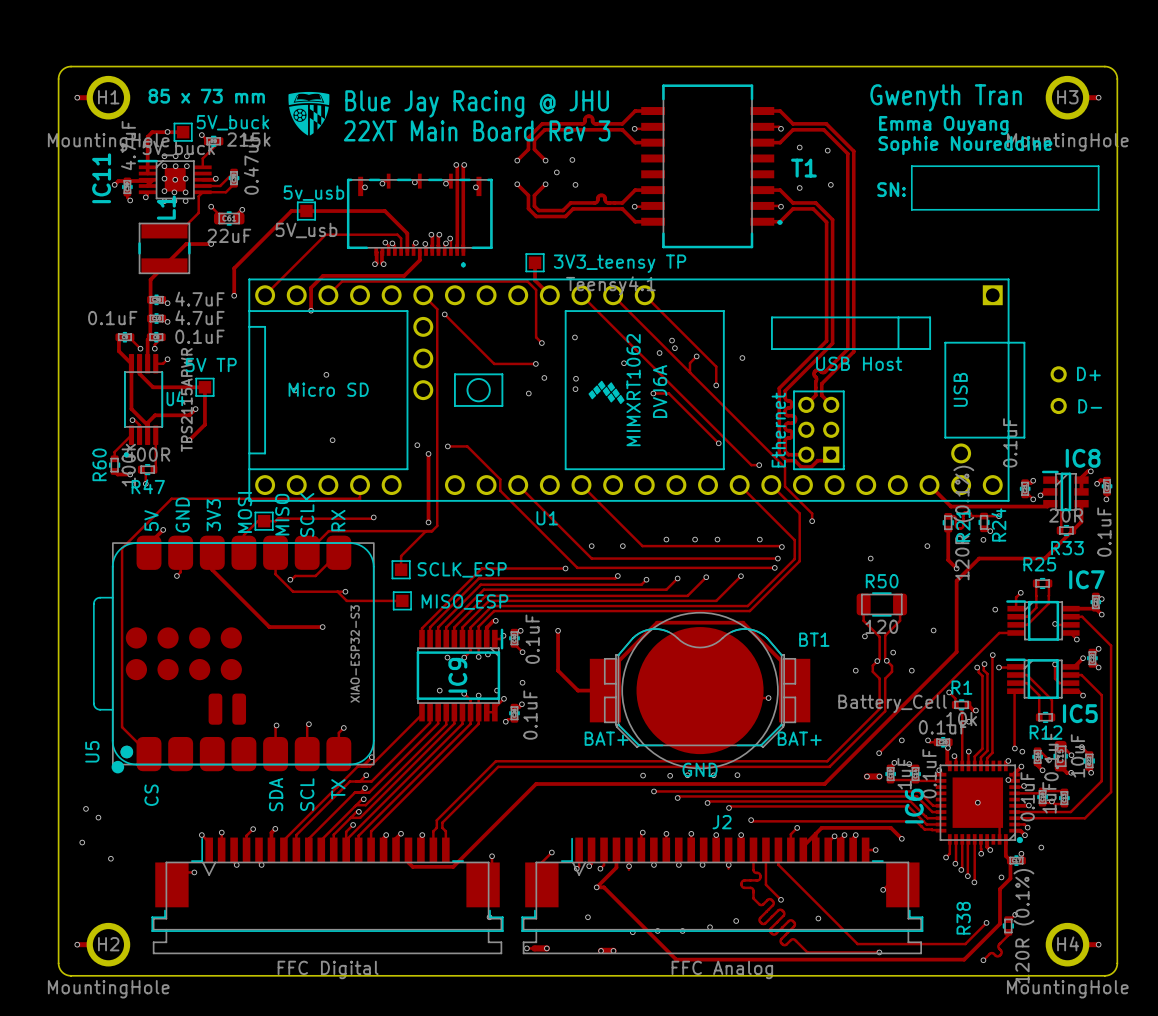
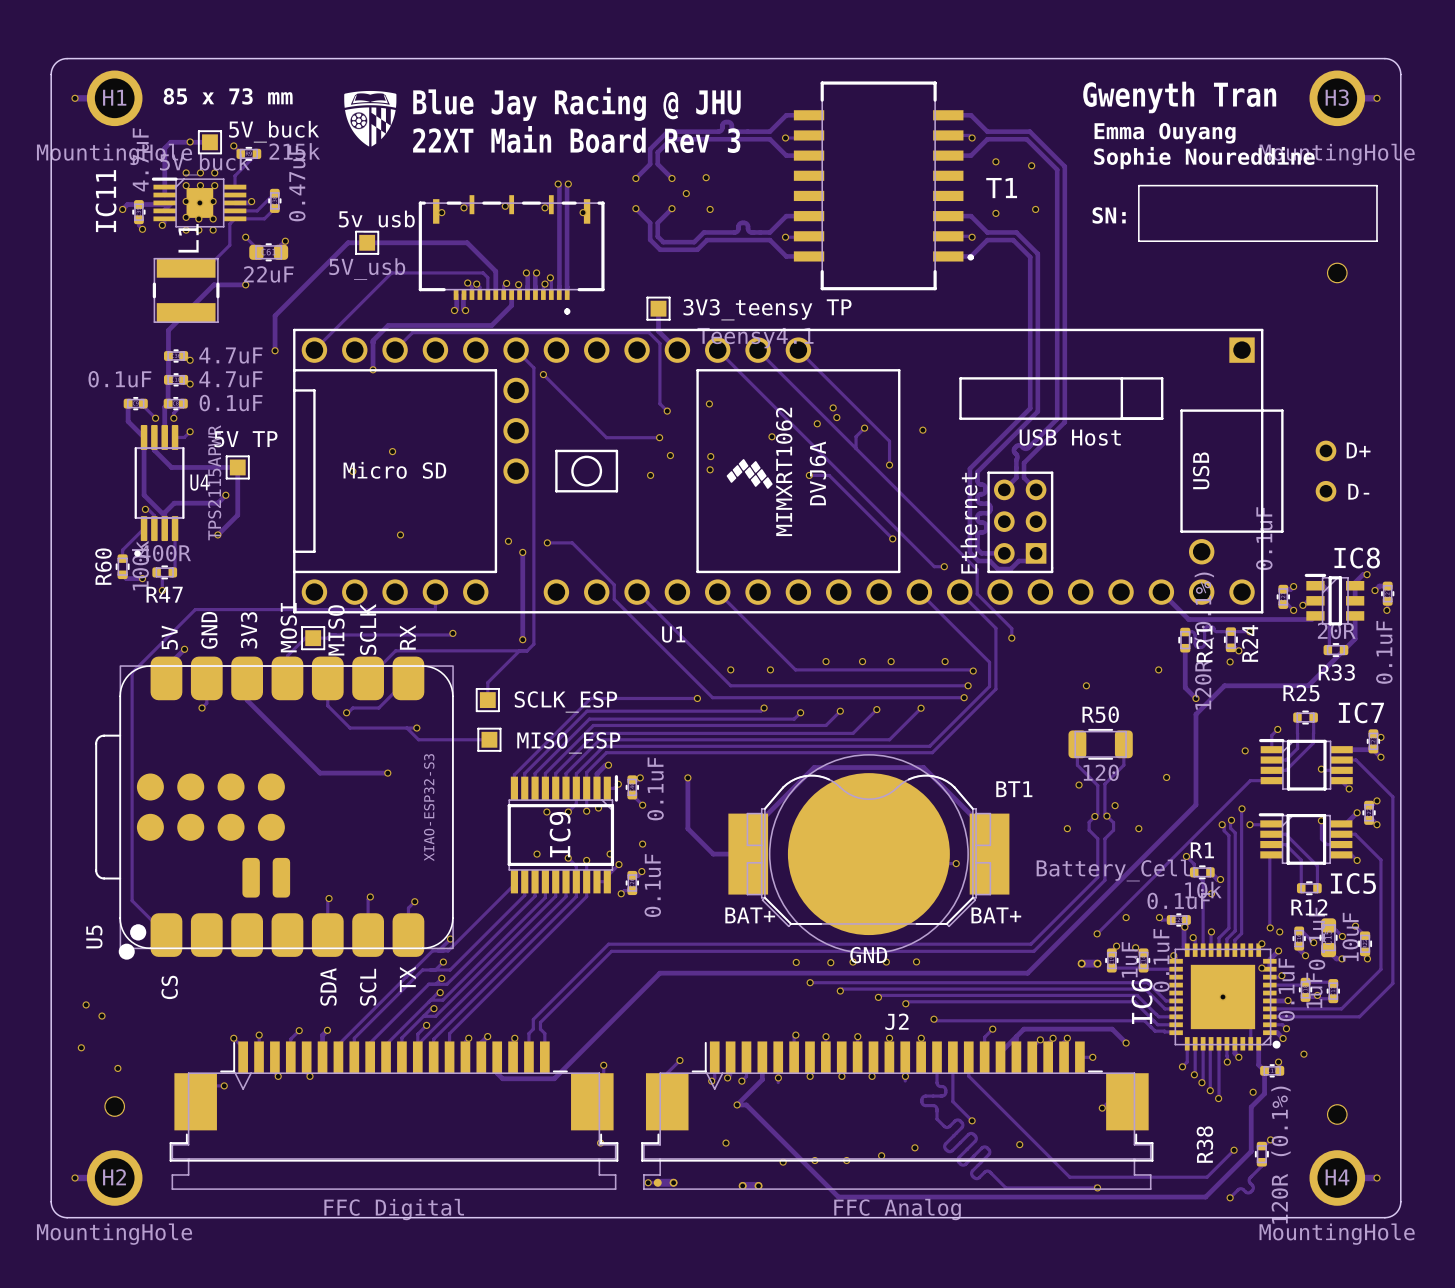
part: none -> (1337, 272)
part: none -> (114, 1106)
part: none -> (1337, 1114)

